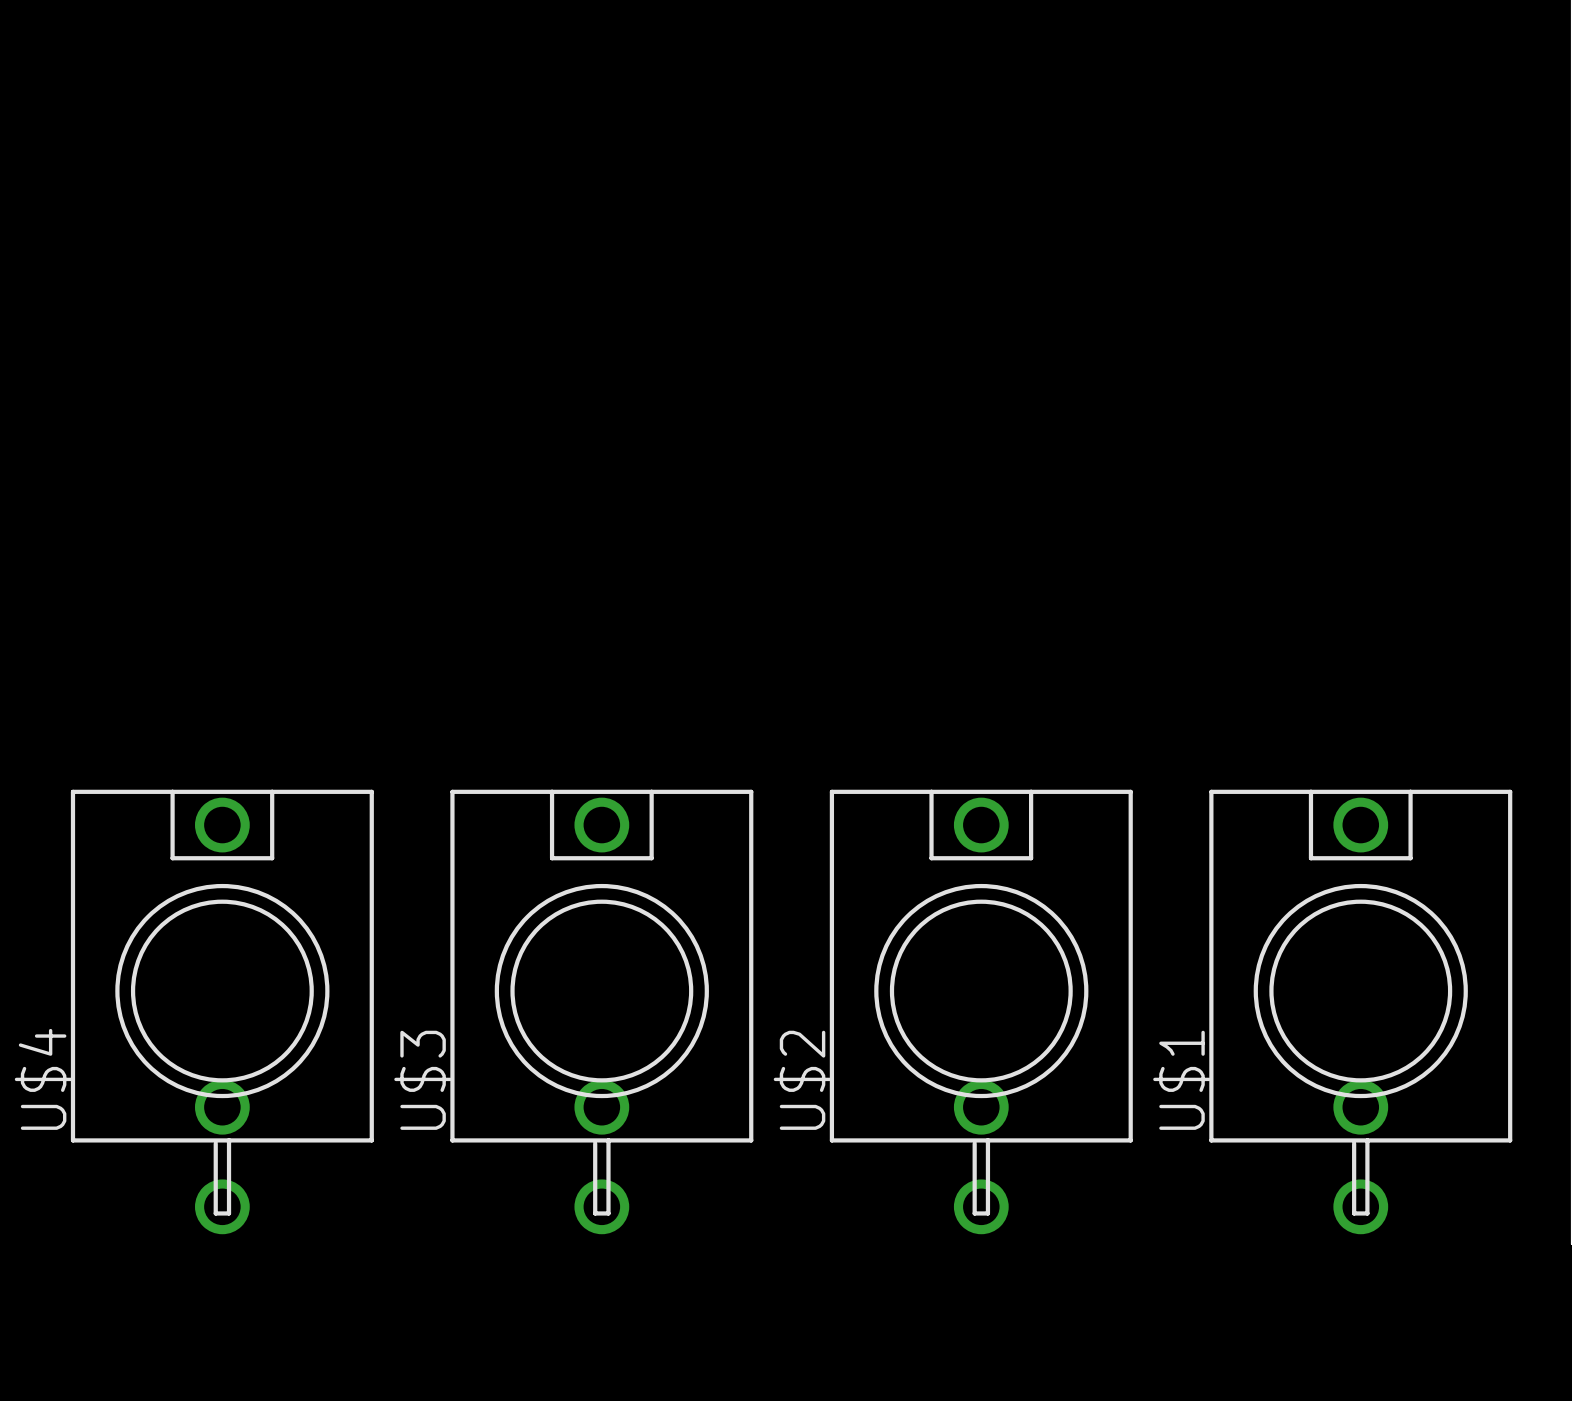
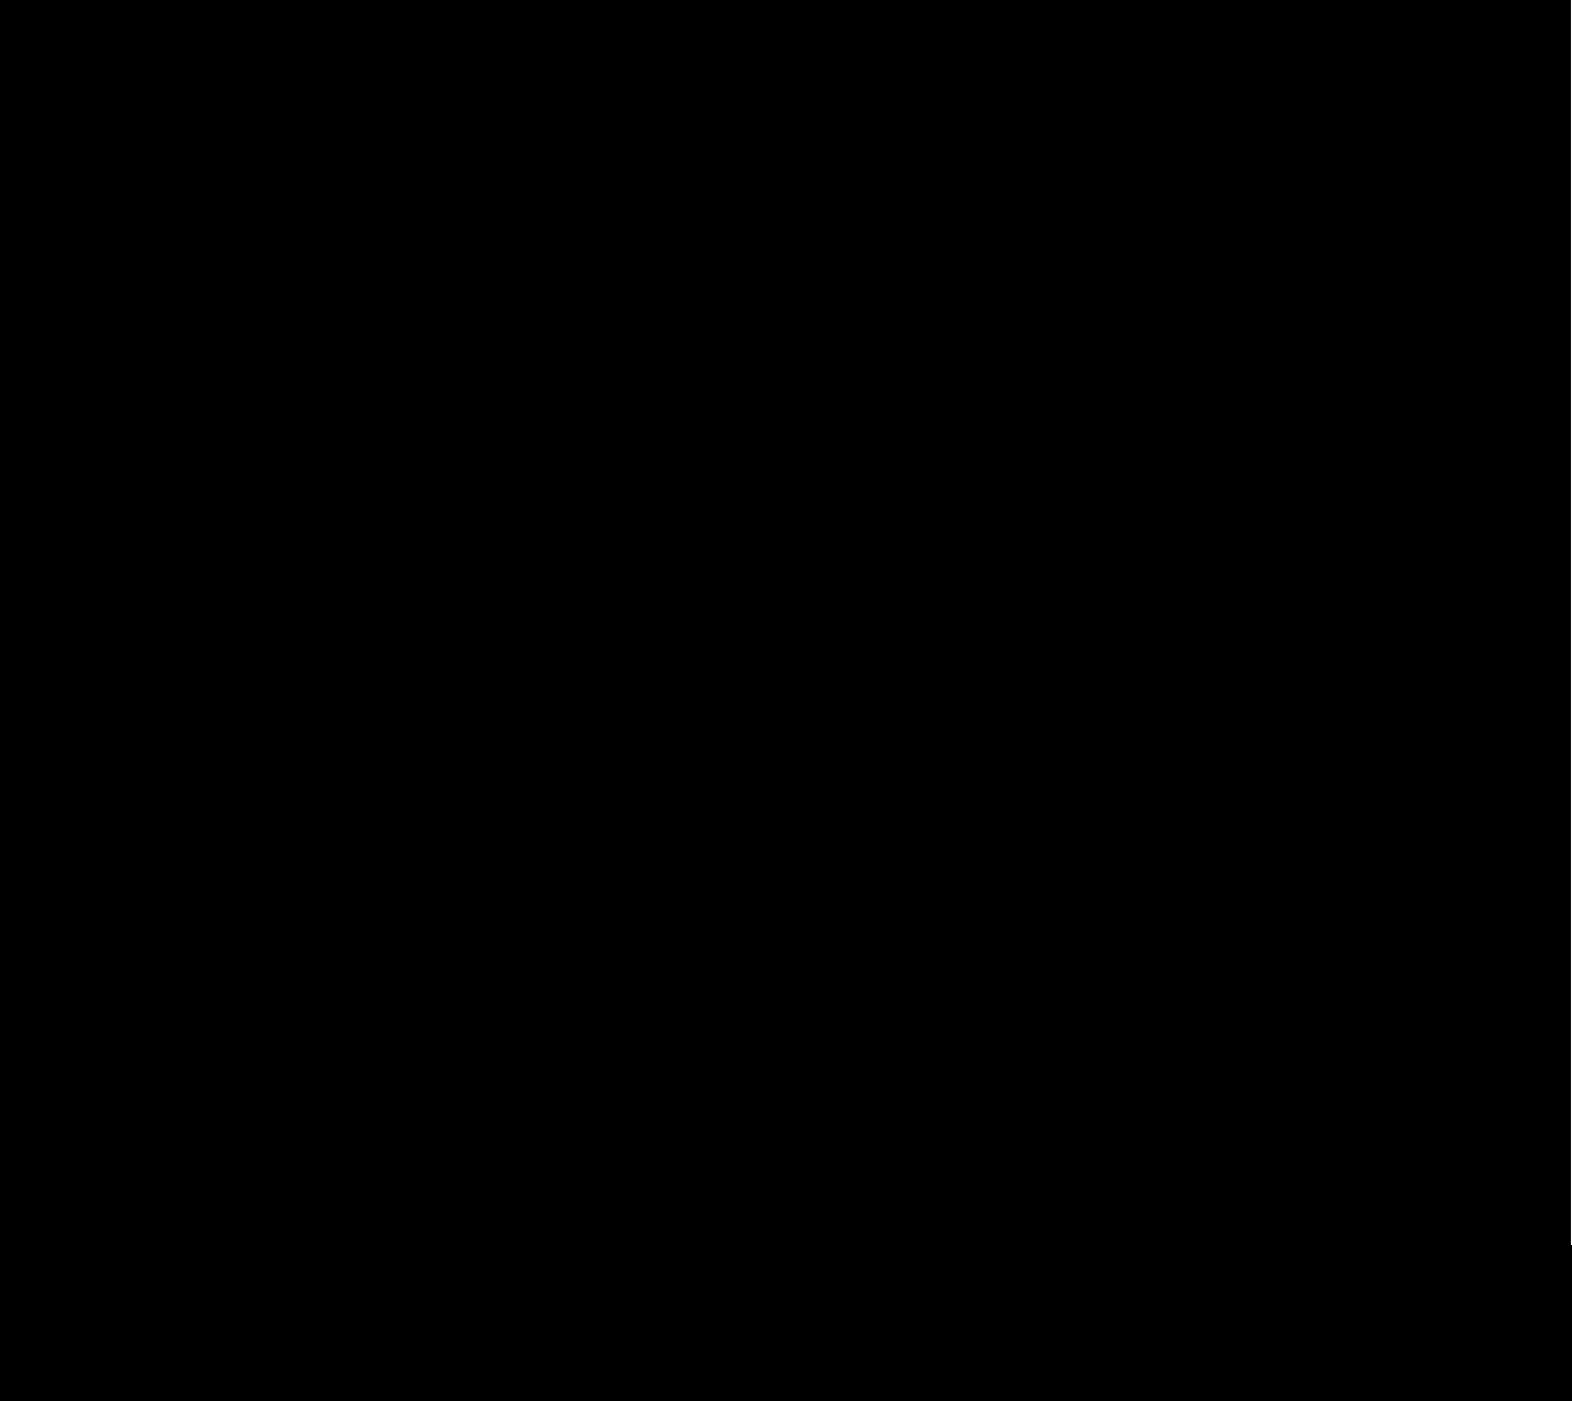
U$4: (222, 1011) -> none
U$3: (601, 1011) -> none
U$2: (981, 1011) -> none
U$1: (1360, 1011) -> none

